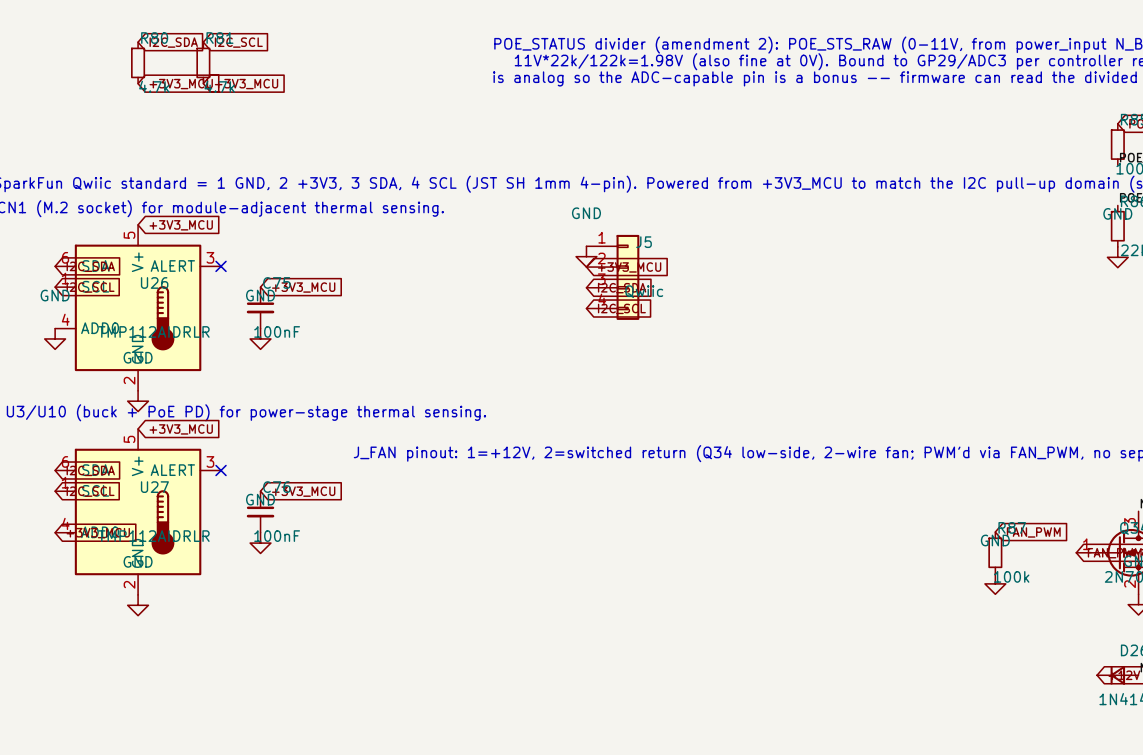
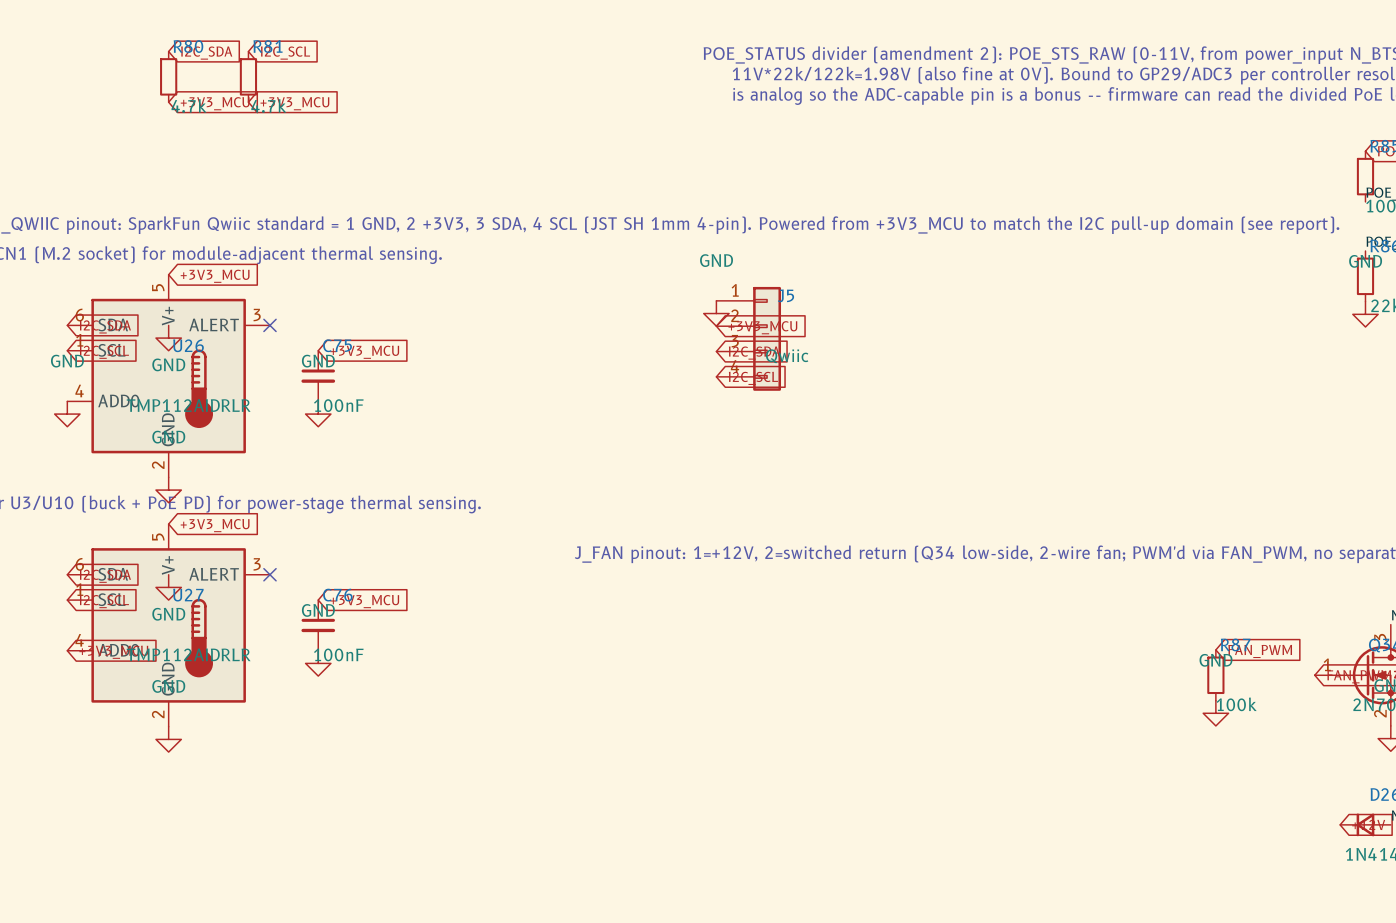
power symbol: none -> GND (168, 338)
power symbol: none -> GND (168, 587)

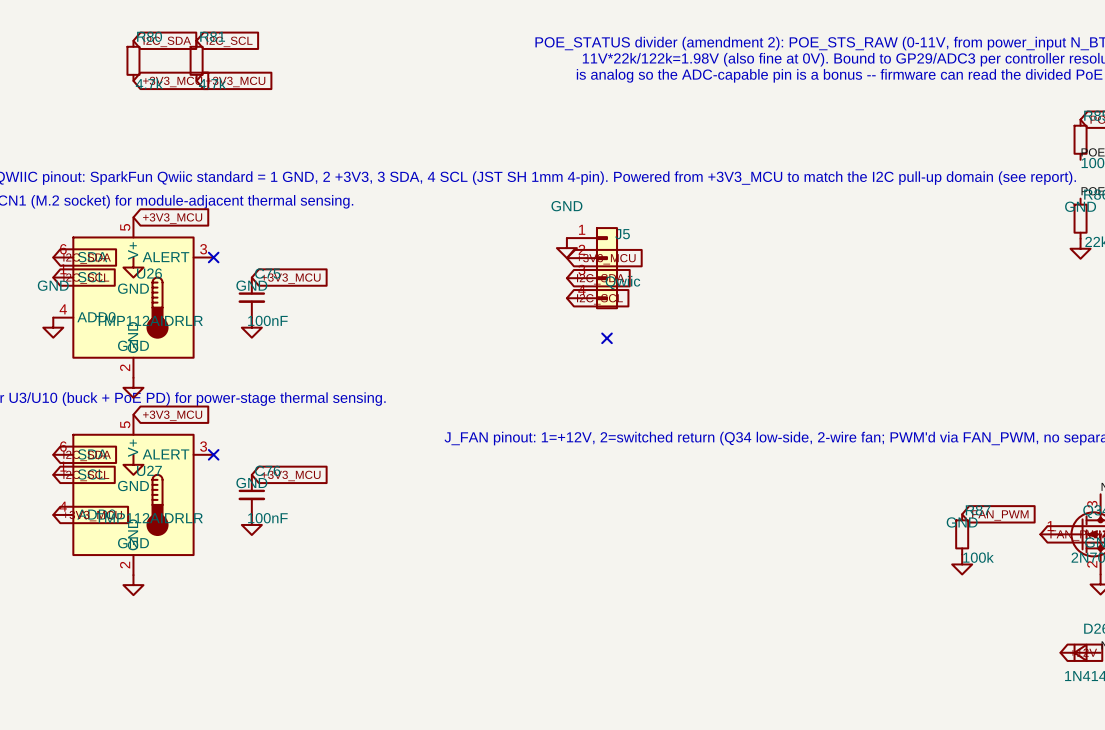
no-connect mark: none -> (607, 338)

